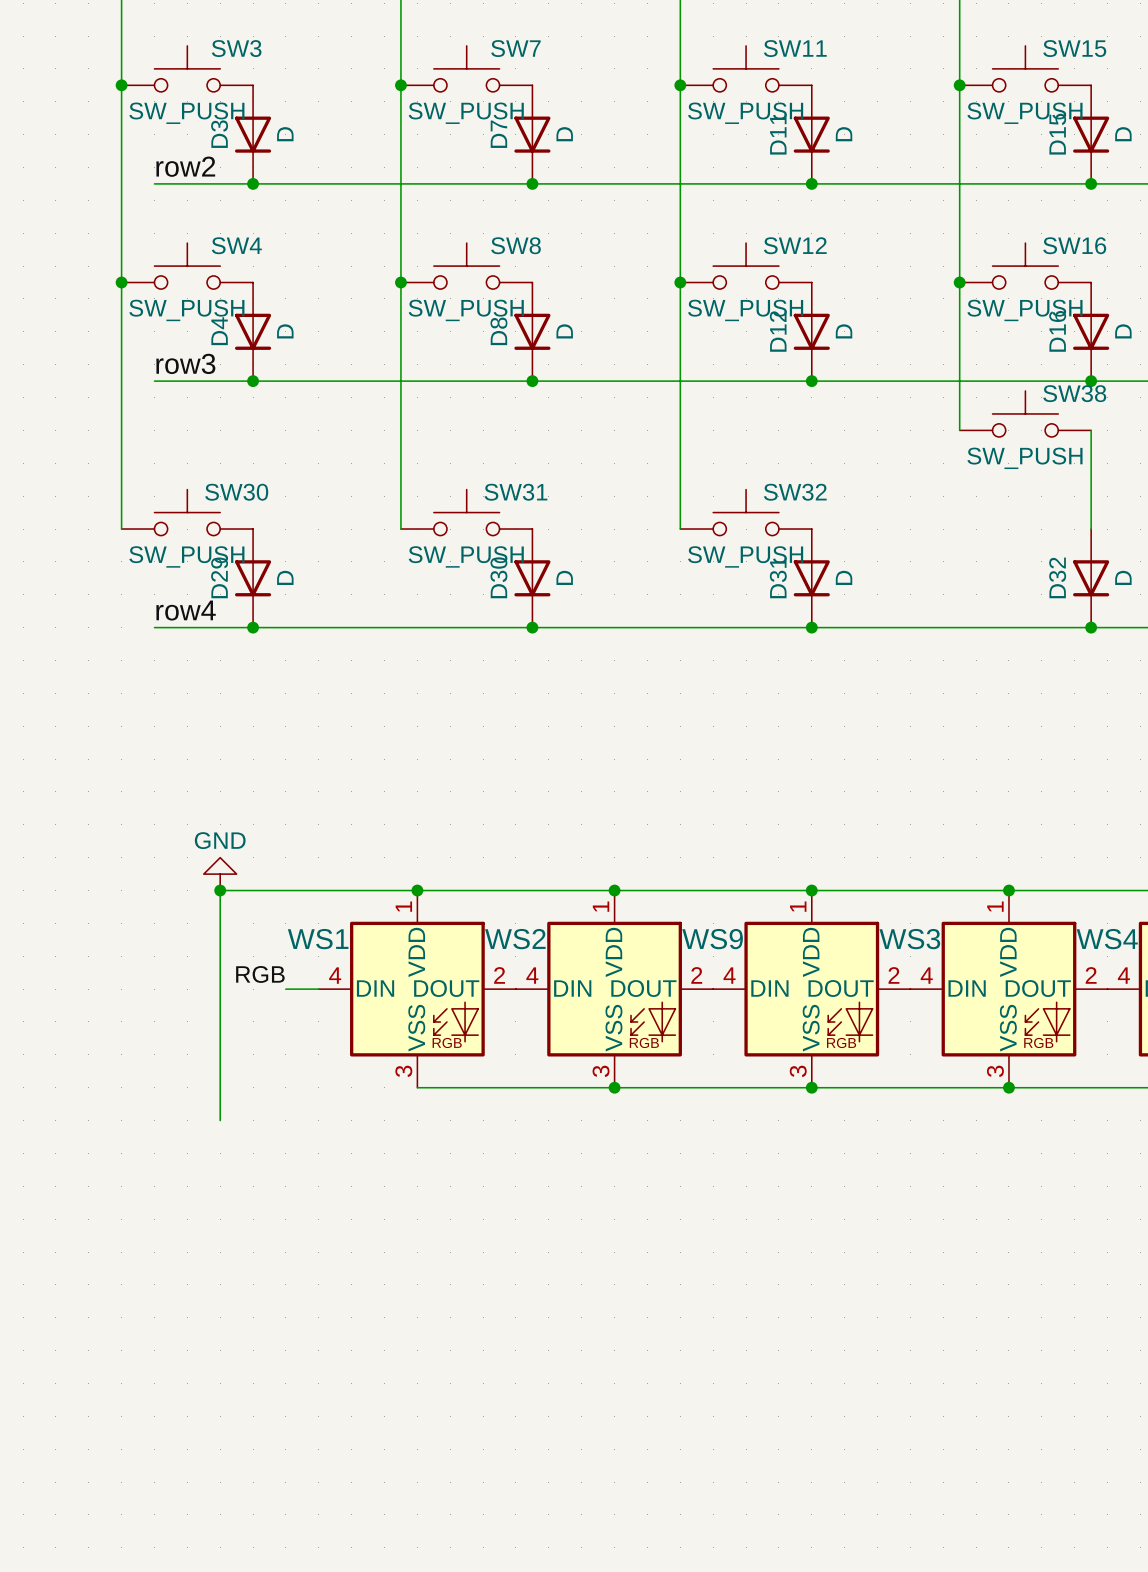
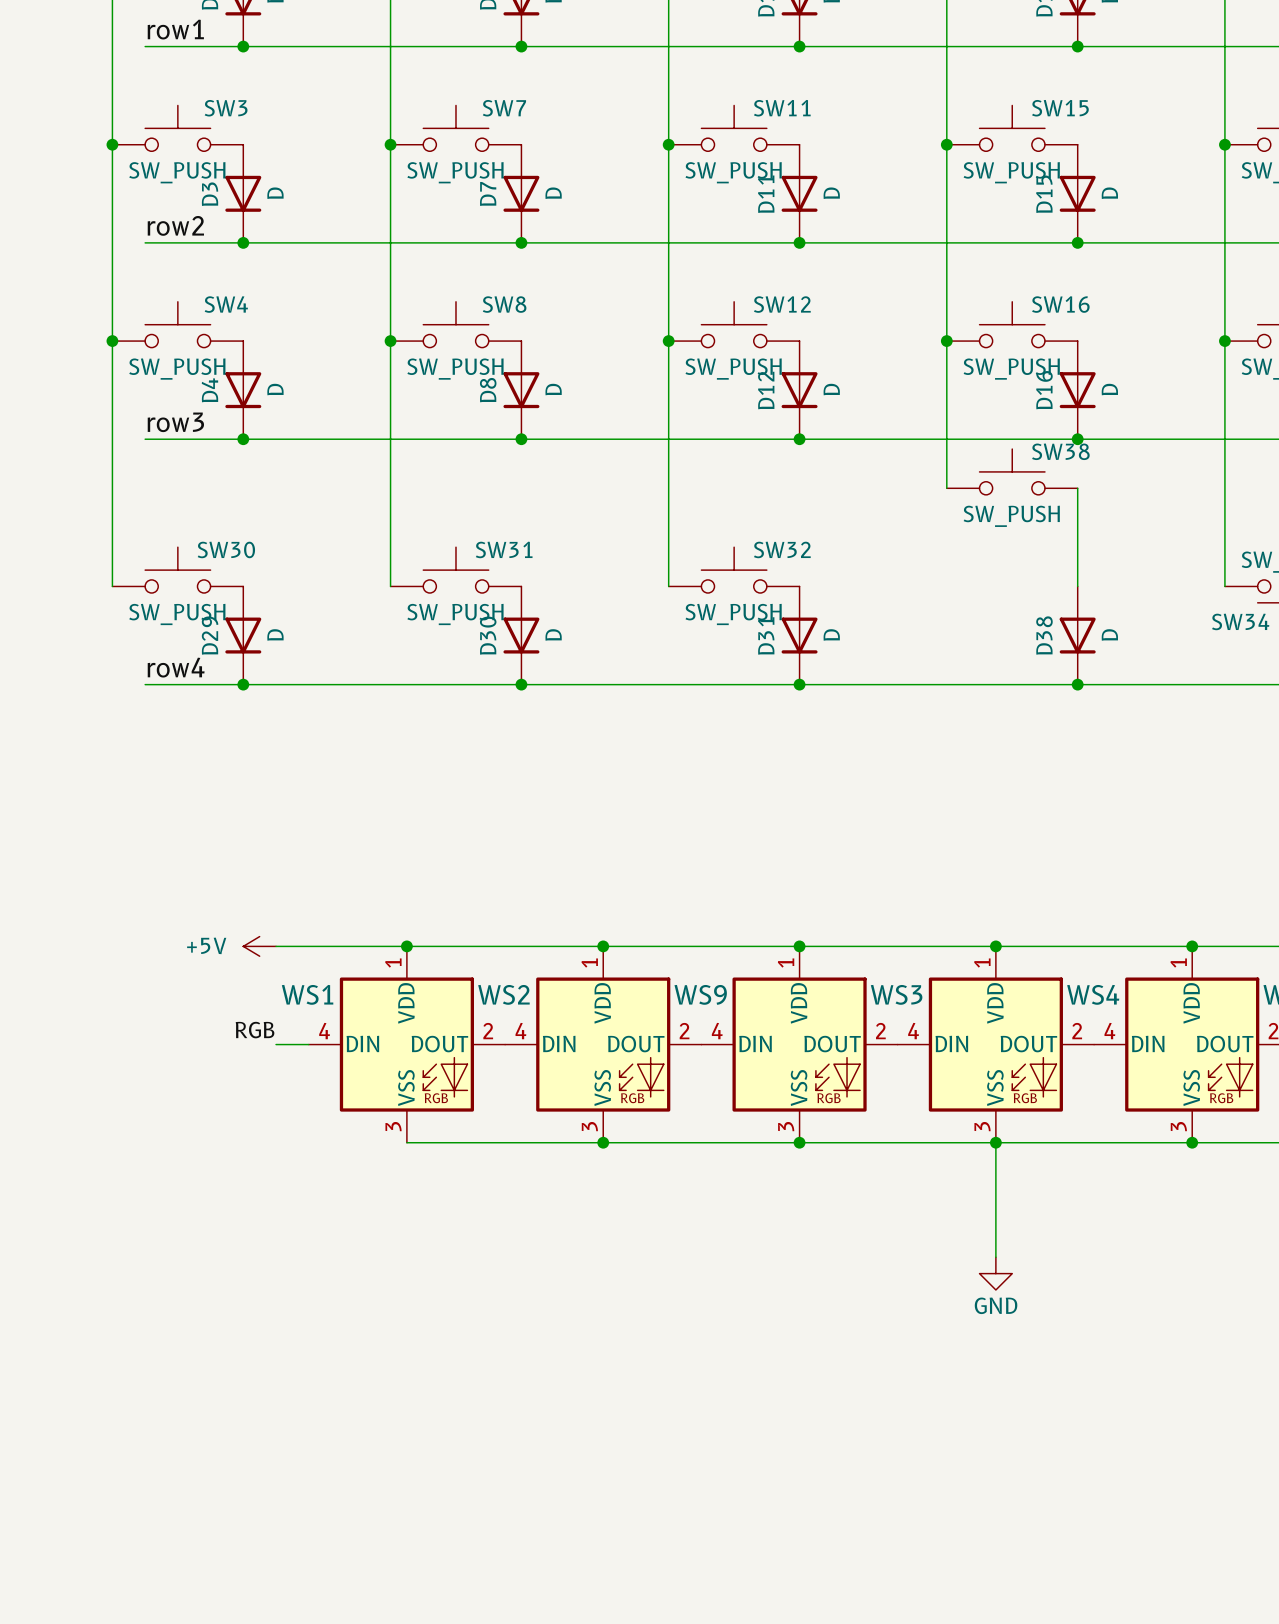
D32 name: D32 (1057, 577) -> D38 (1044, 635)
power symbol: GND (220, 874) -> none
junction: (220, 890) -> none
power symbol: none -> +5V (259, 946)
wire: (285, 890) (220, 890) (220, 1120) -> none
wire: none -> (995, 1142) (995, 1257)
power symbol: none -> GND (995, 1273)

